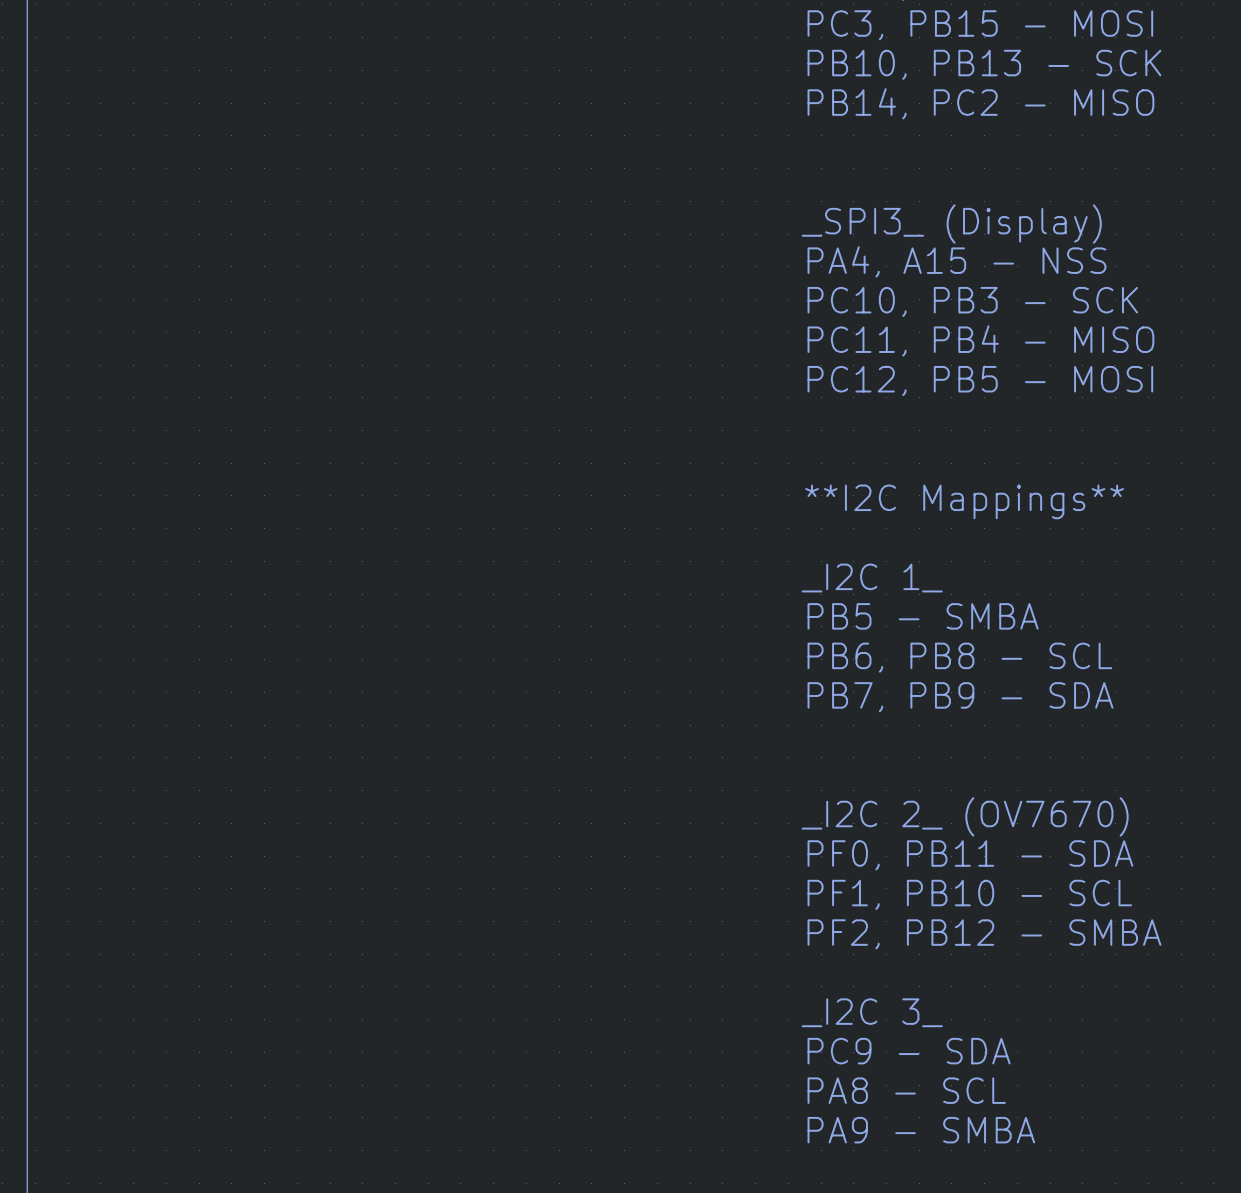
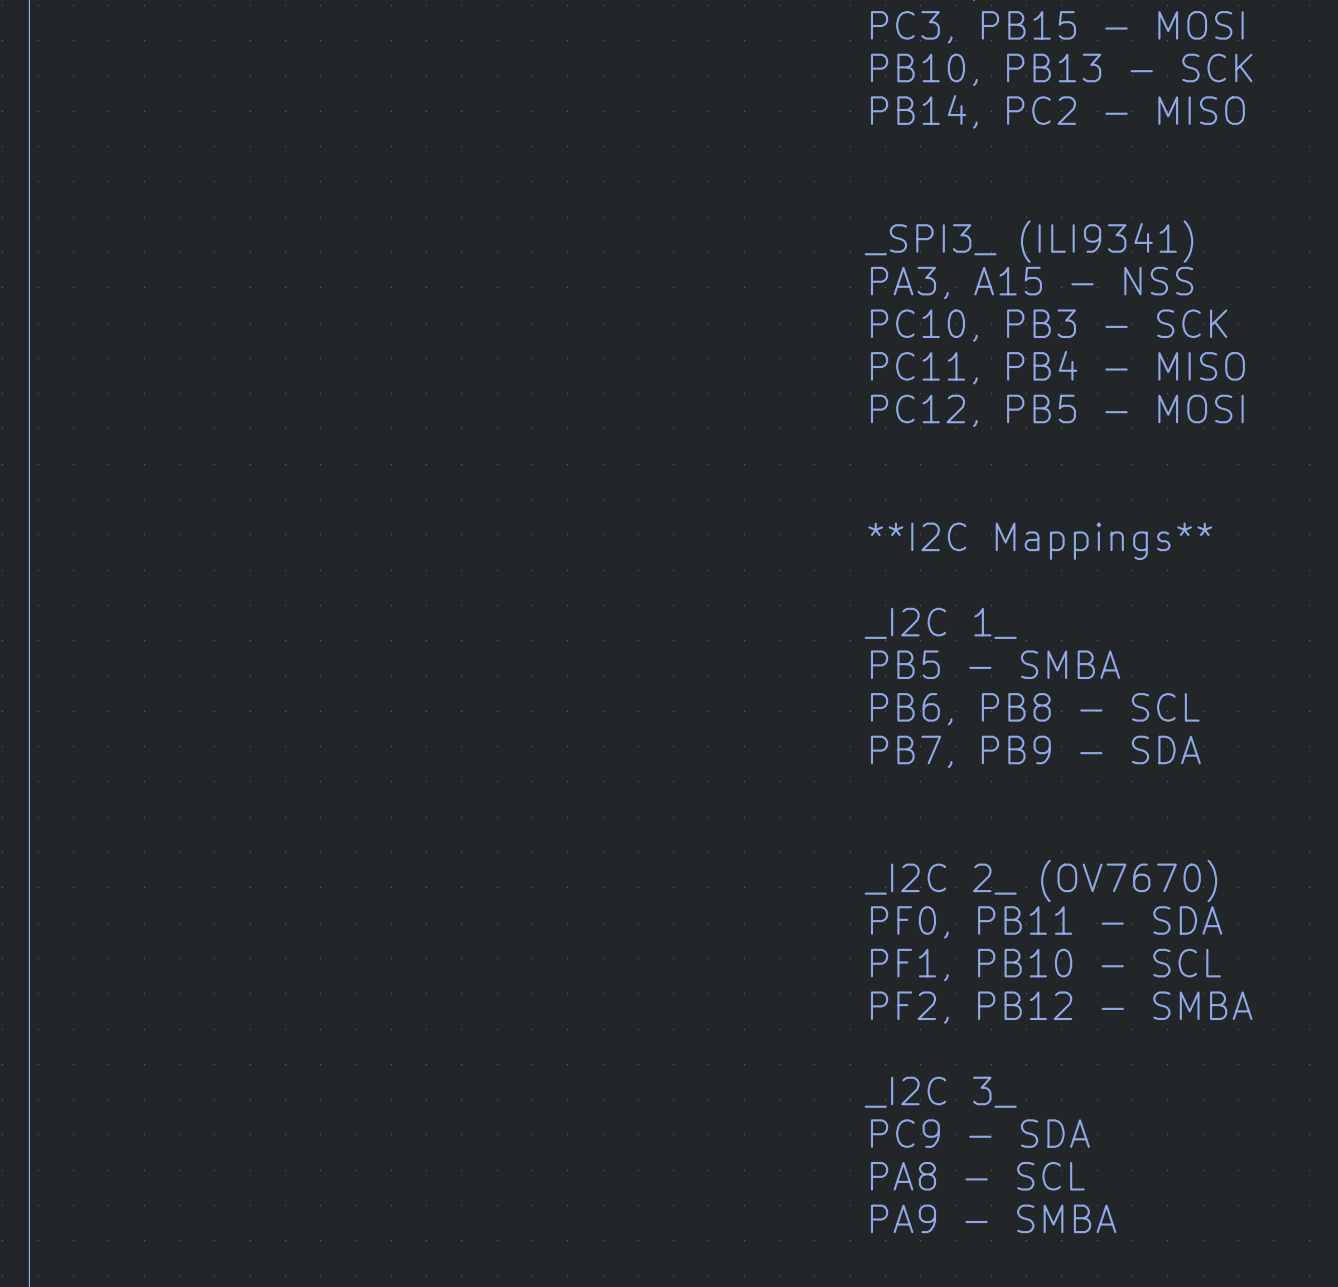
text: _SPI3_ (Display) (951, 224) -> _SPI3_ (ILI9341) (1028, 241)
text: PA4, A15 - NSS (956, 261) -> PA3, A15 - NSS (1032, 283)

